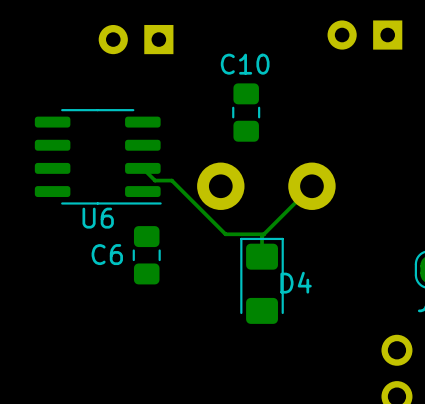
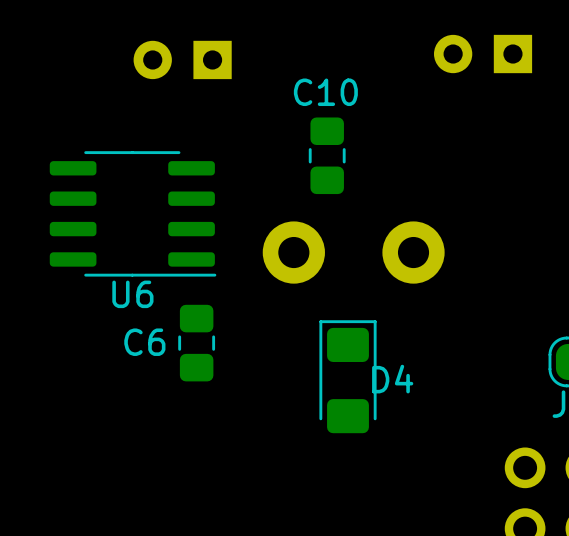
track: (142, 168) (155, 180) (171, 180) (225, 234) (263, 234) -> none
track: (311, 186) (262, 236) (262, 256) -> none

